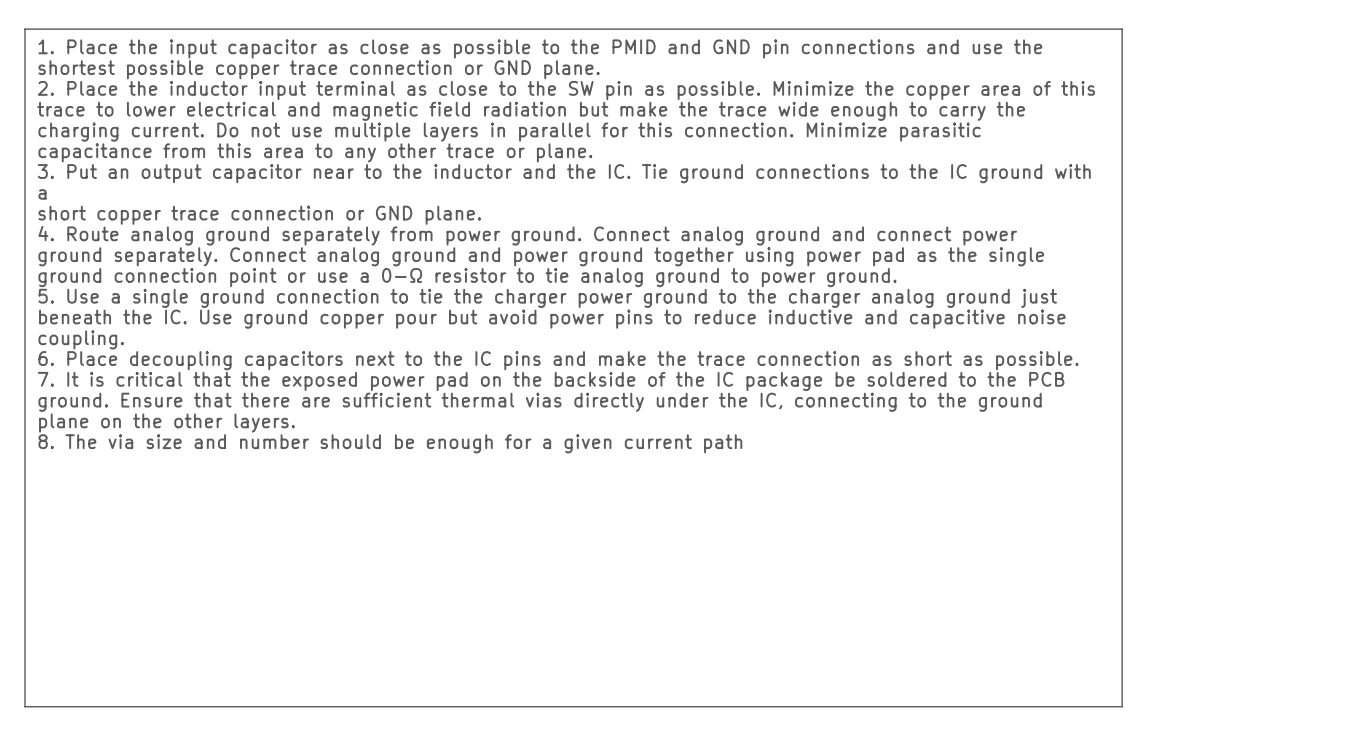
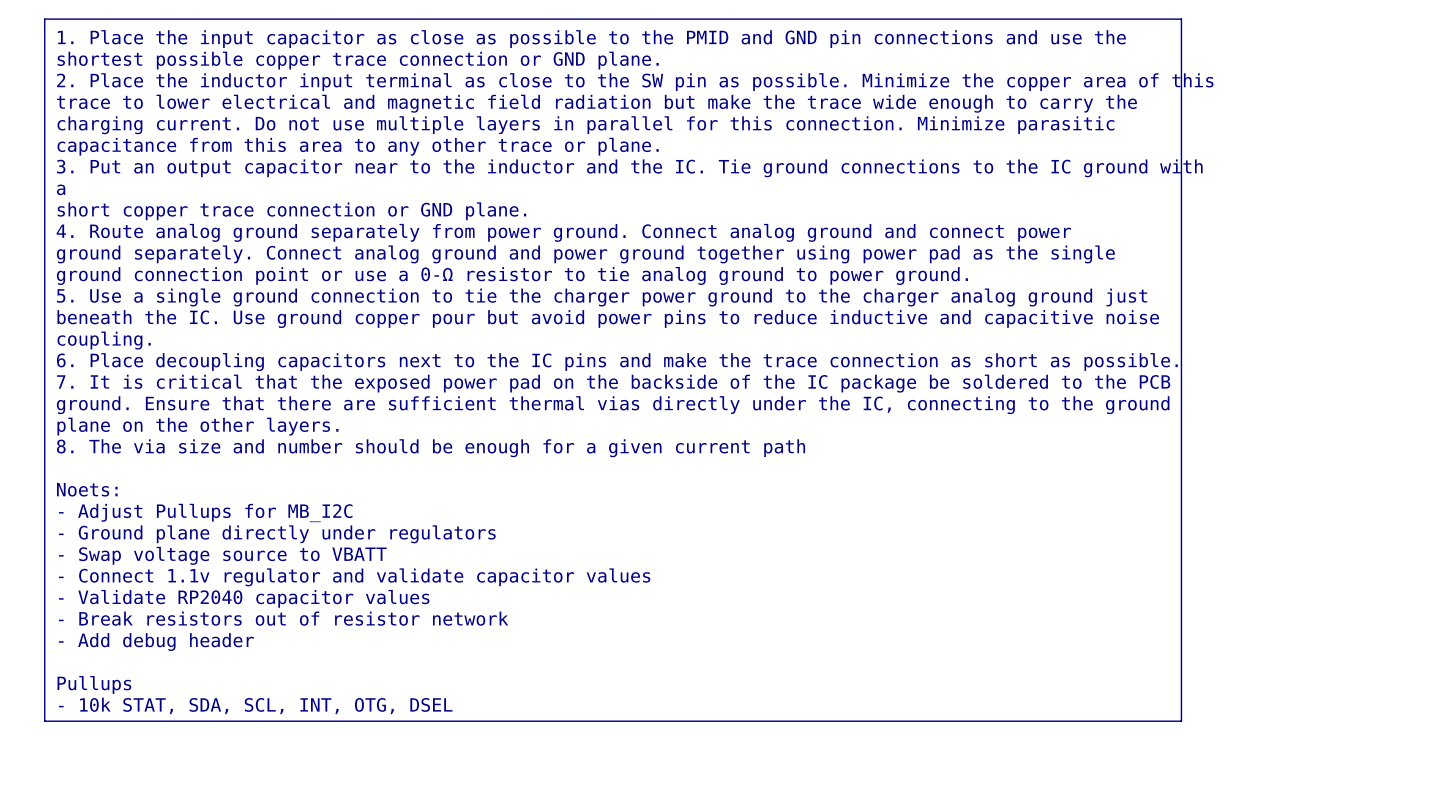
text: none -> Noets: (87, 489)
text: none -> - Adjust Pullups for MB_I2C (205, 512)
text: none -> - Ground plane directly under regulators (277, 534)
text: none -> - Swap voltage source to VBATT (222, 555)
text: none -> - Connect 1.1v regulator and validate capacitor values (354, 577)
text: none -> - Validate RP2040 capacitor values (244, 598)
text: none -> - Break resistors out of resistor network (283, 618)
text: none -> - Add debug header (156, 642)
text: none -> Pullups (94, 684)
text: none -> - 10k STAT, SDA, SCL, INT, OTG, DSEL (255, 705)

